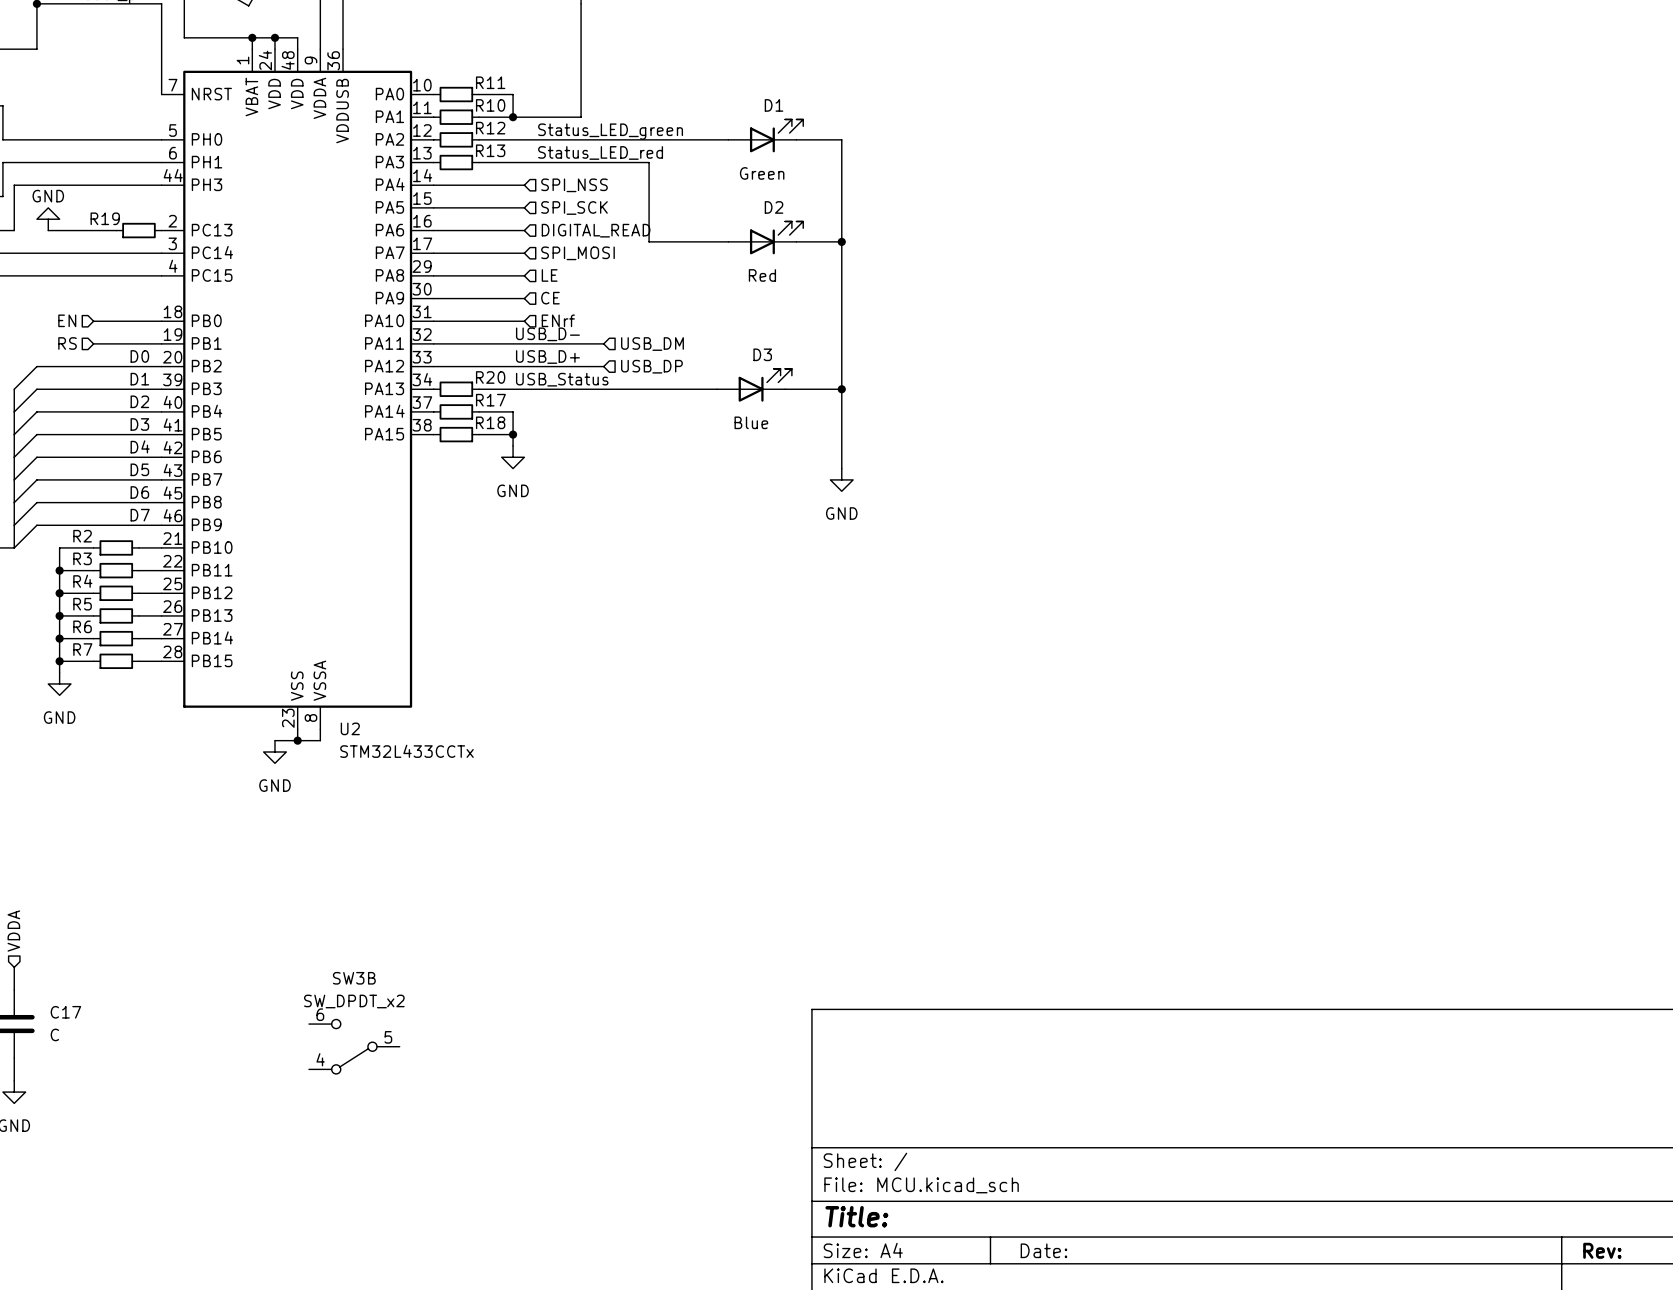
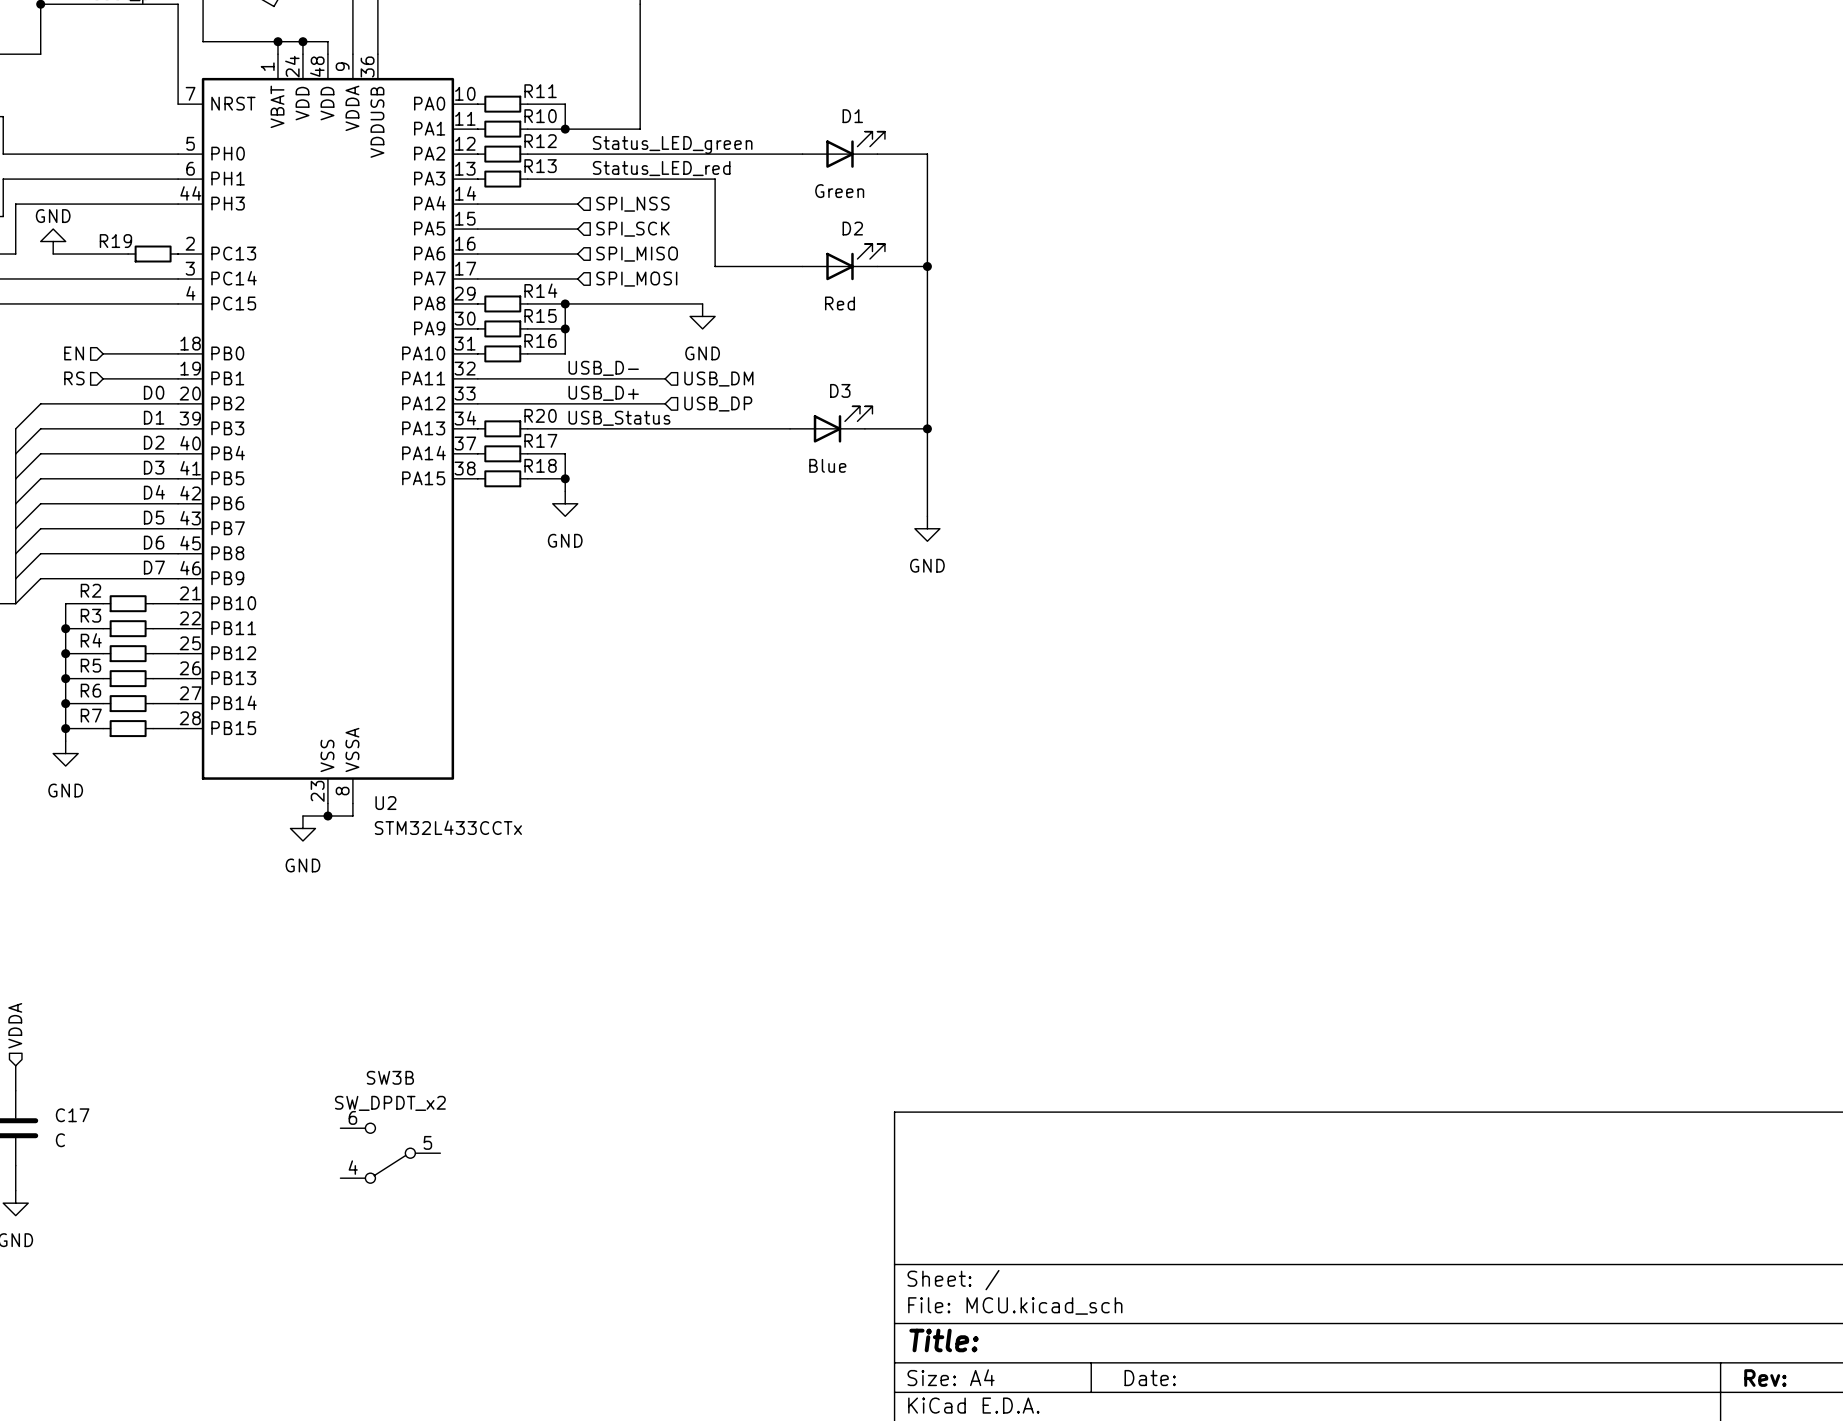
hierarchical label: DIGITAL_READ (596, 230) -> SPI_MISO (637, 254)
wire: (433, 275) (479, 275) -> none
R14: none -> (502, 303)
junction: none -> (565, 303)
wire: none -> (577, 303) (702, 303)
hierarchical label: LE (549, 275) -> none
power symbol: none -> GND (702, 316)
wire: (433, 298) (479, 298) -> none
R15: none -> (502, 328)
wire: (513, 298) (524, 298) -> none
junction: none -> (565, 328)
hierarchical label: CE (550, 298) -> none
hierarchical label: ENrf (558, 320) -> none
wire: (433, 321) (479, 321) -> none
R16: none -> (502, 353)
wire: (513, 321) (524, 321) -> (565, 353) (565, 303)

